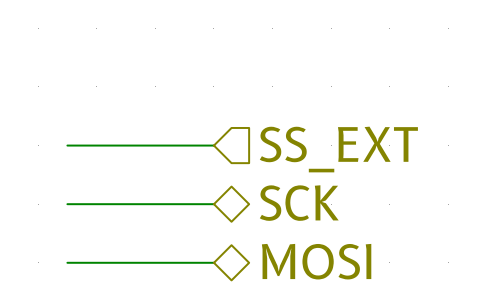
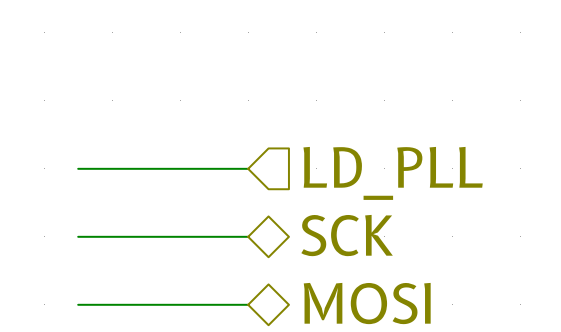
hierarchical label: SS_EXT (338, 149) -> LD_PLL (393, 173)

